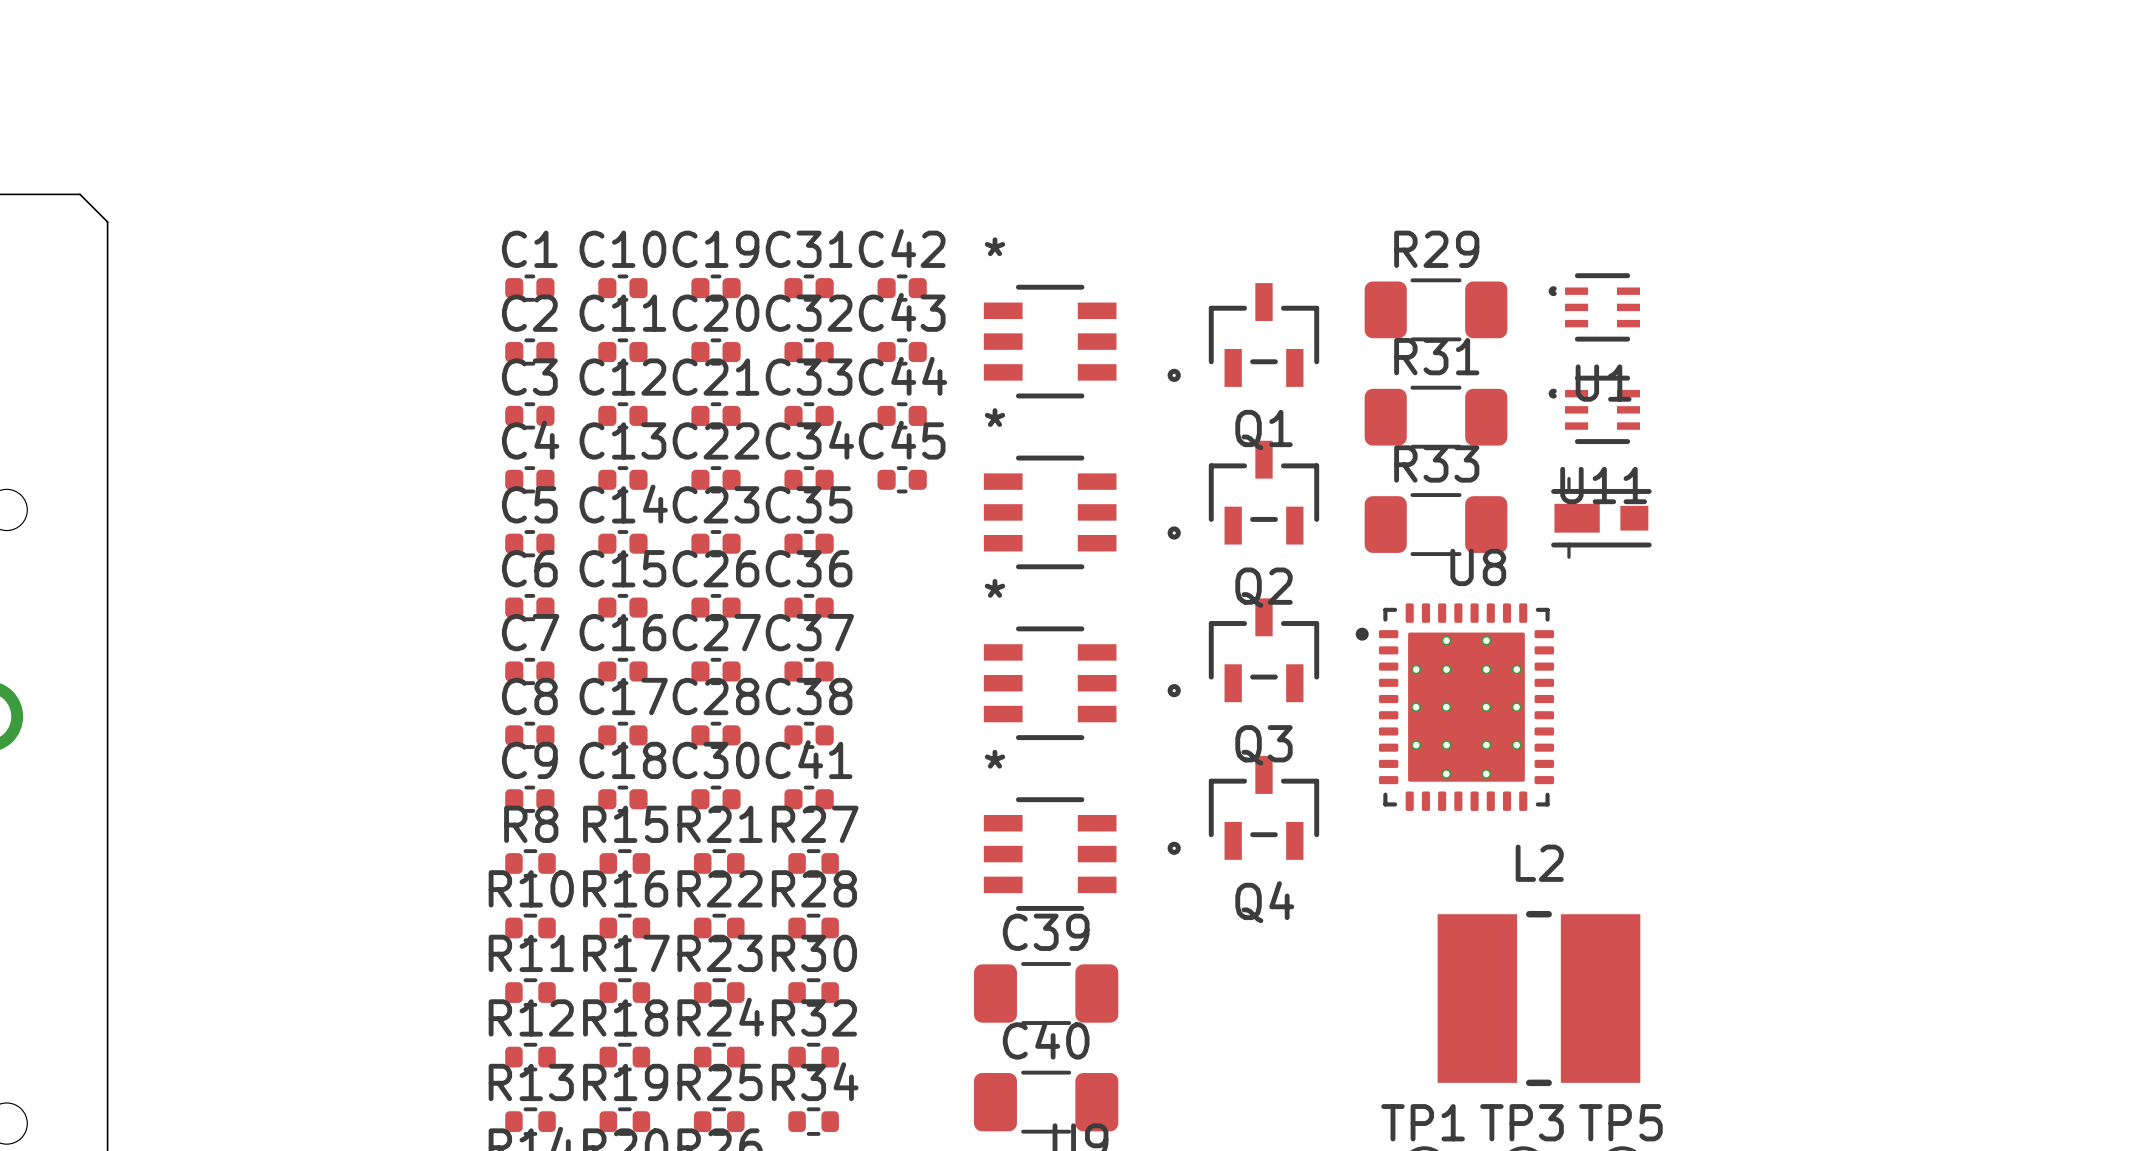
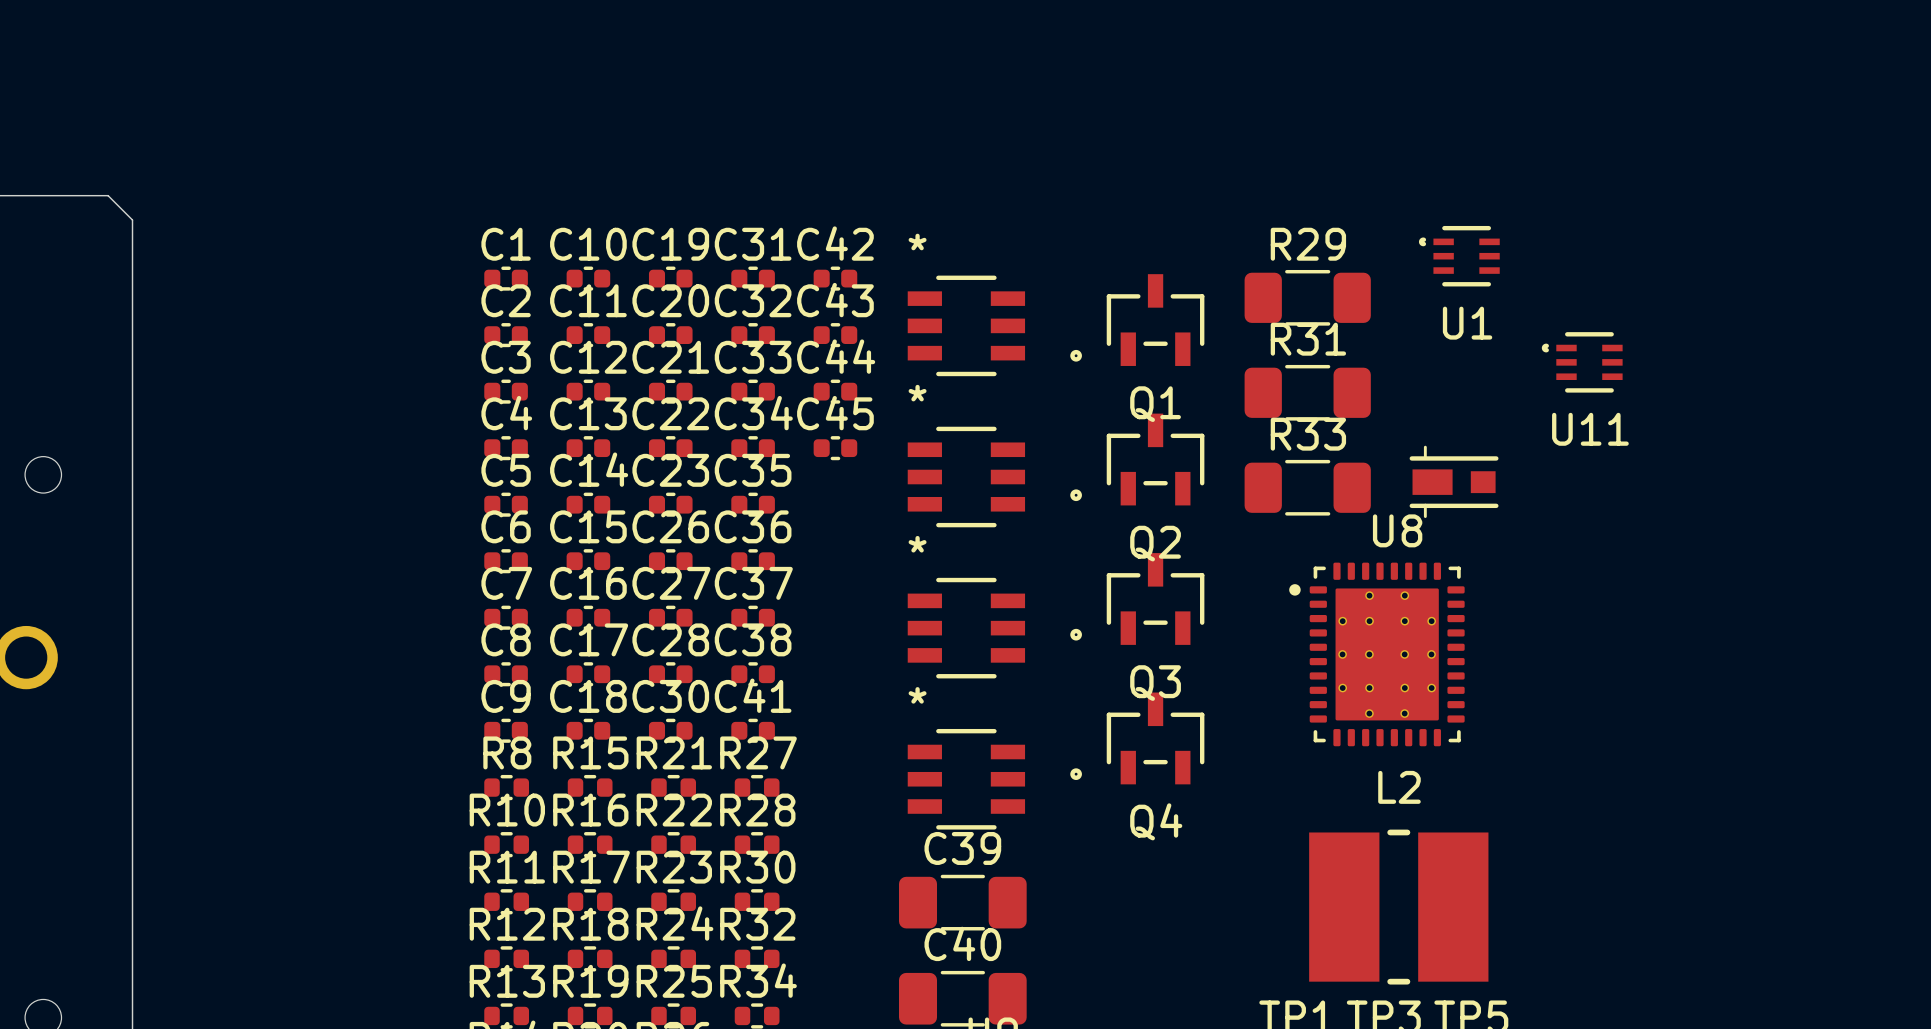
U1 position: (1594, 307) -> (1459, 256)
U11 position: (1594, 409) -> (1582, 362)
U8 position: (1454, 707) -> (1376, 654)

